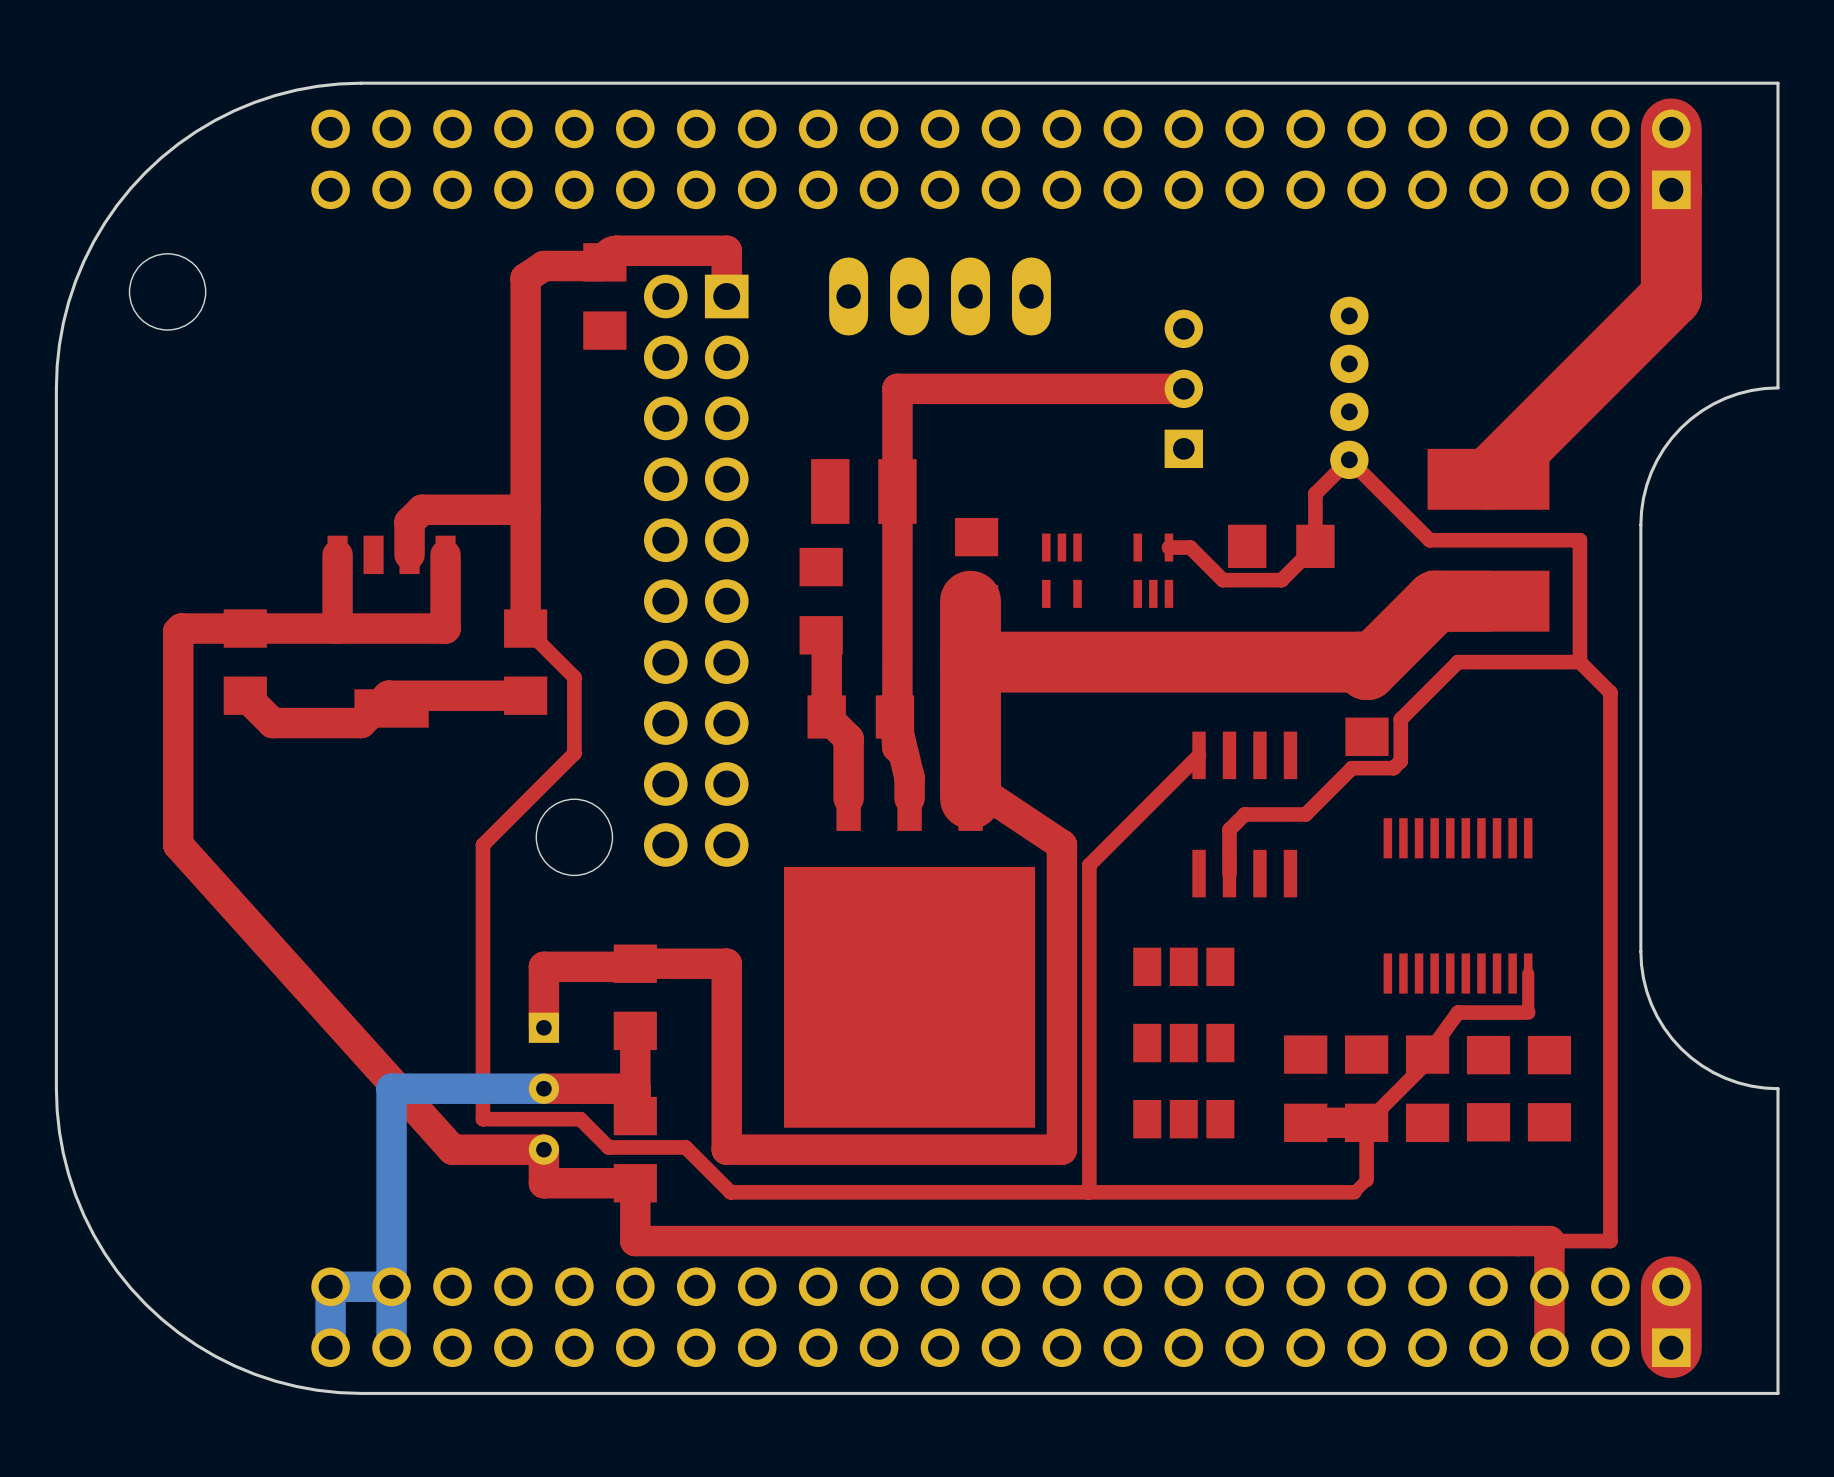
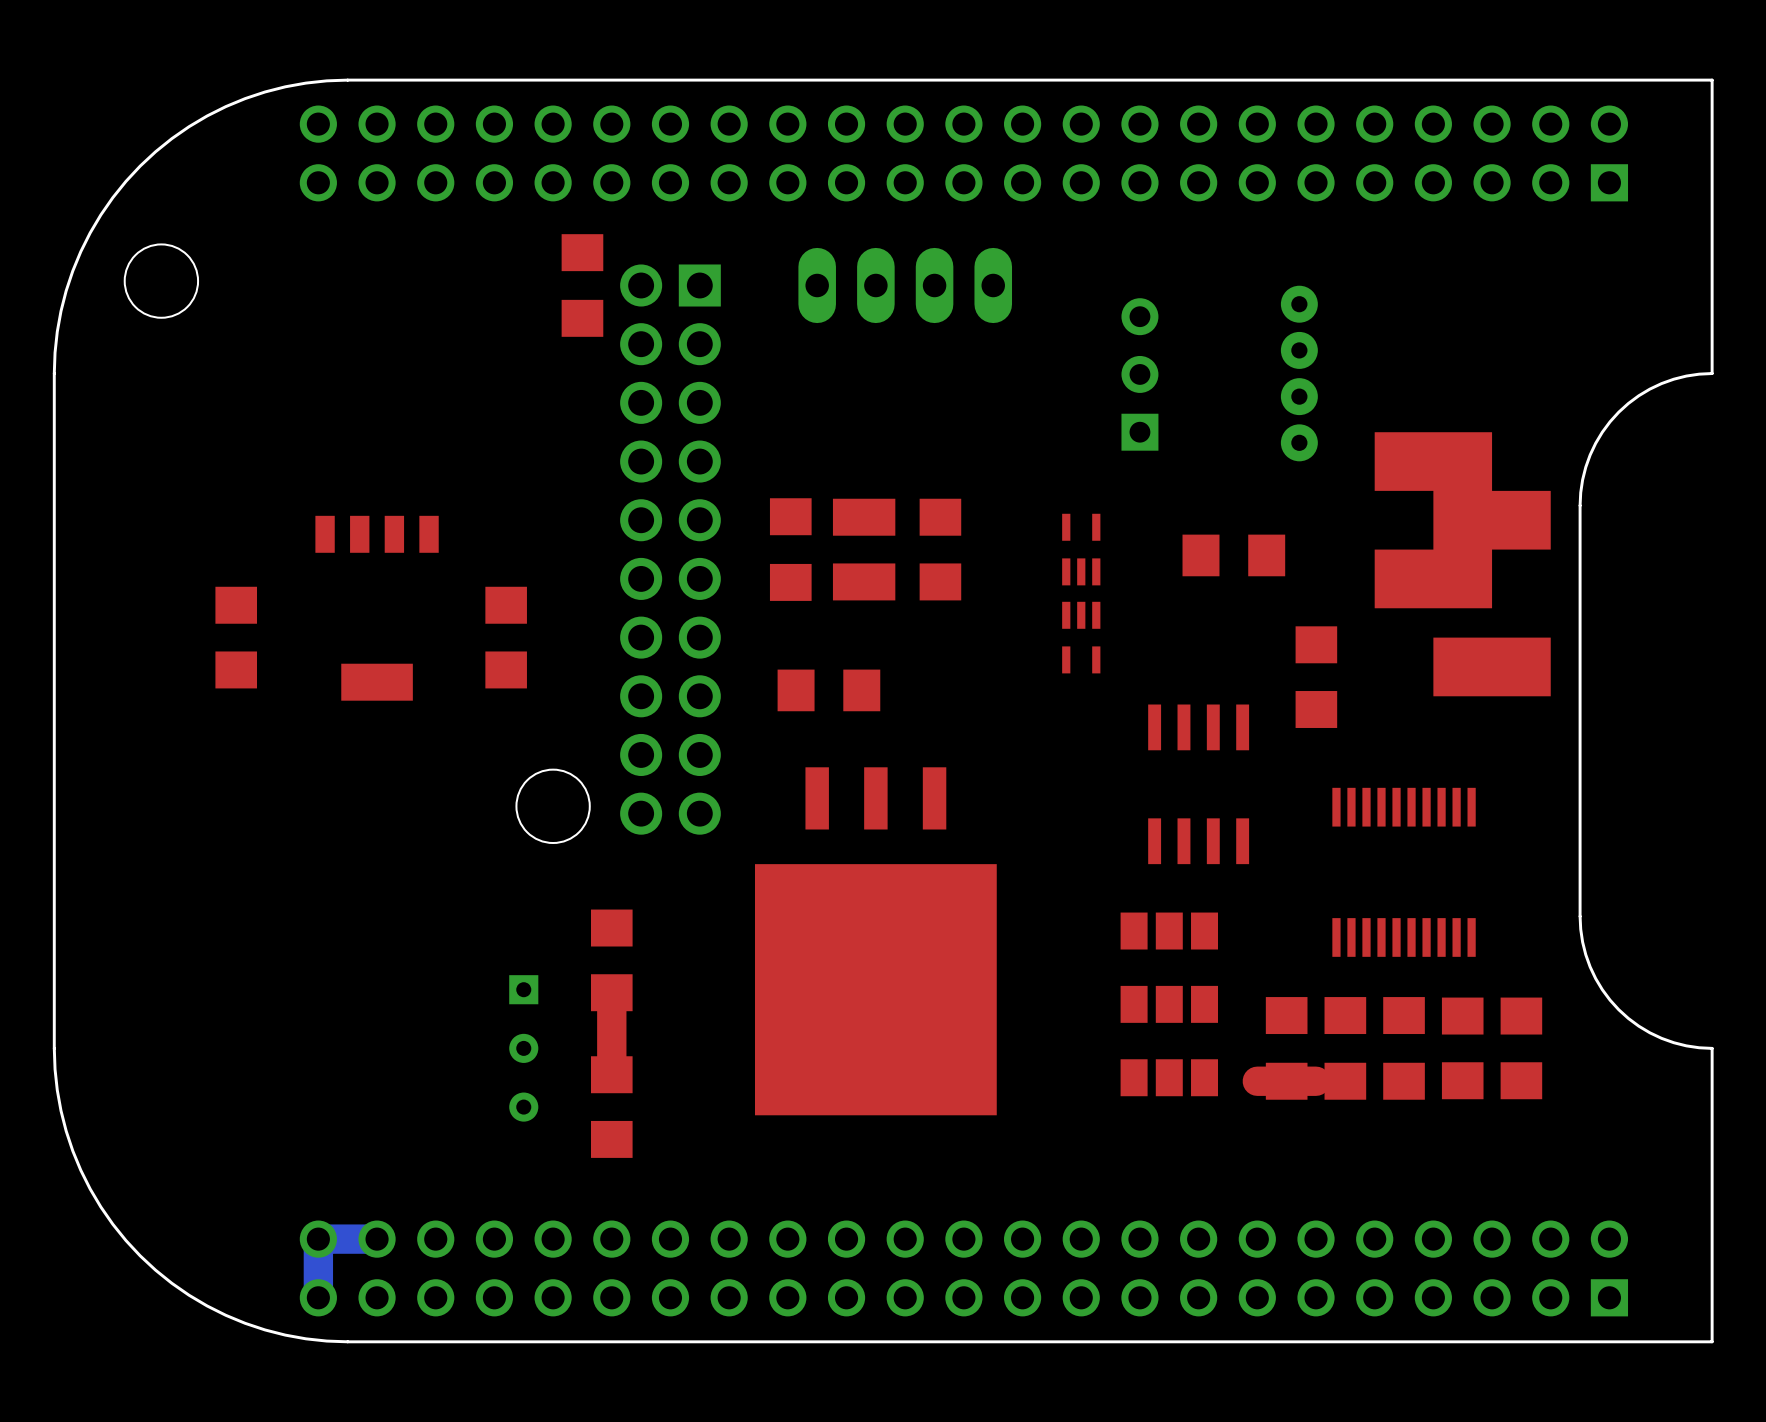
top track: (1671, 128) (1671, 296) (1488, 479) -> none
top track: (726, 296) (726, 250) (614, 250) (608, 254) (601, 266) (543, 266) (525, 278) (525, 628) (574, 677) (574, 753) (482, 844) (482, 1119) (580, 1119) (608, 1147) (685, 1147) (730, 1192) (1354, 1192) (1366, 1180) (1366, 1122) (1427, 1061) (1427, 1054) (1458, 1012) (1528, 1012) (1528, 973) -> none
top track: (1183, 388) (897, 388) (897, 491) (897, 747) (894, 716) (909, 777) (909, 798) -> none
part rotation: 0° (863, 491) -> 90° clockwise (864, 549)
part position: (863, 491) -> (864, 549)
top track: (525, 509) (422, 509) (409, 522) (409, 554) -> none
part: none -> (1492, 520)
part position: (1281, 546) -> (1233, 555)
top track: (1168, 547) (1190, 547) (1222, 580) (1281, 580) (1315, 546) (1315, 493) (1349, 459) (1429, 540) (1579, 540) (1579, 662) -> none
top track: (337, 554) (337, 628) -> none
top track: (445, 554) (445, 628) (181, 628) (178, 631) (178, 844) (452, 1149) (543, 1149) (543, 1183) (635, 1183) (635, 1241) (1549, 1241) (1549, 1347) -> none
part: (1061, 570) -> none
part: none -> (1081, 549)
part: (1153, 570) -> none
part position: (821, 601) -> (790, 549)
top track: (970, 601) (970, 798) -> none
top track: (1488, 601) (1435, 601) (1367, 669) (1359, 662) (970, 662) -> none
top track: (821, 635) (826, 640) (826, 716) (848, 738) (848, 798) -> none
part: none -> (1081, 637)
top track: (1579, 662) (1458, 662) (1400, 719) (1400, 761) (1393, 768) (1352, 768) (1305, 814) (1244, 814) (1229, 829) (1229, 873) -> none
top track: (1579, 662) (1610, 692) (1610, 1241) (1518, 1241) -> none
part: none -> (1492, 666)
top track: (525, 695) (388, 695) (361, 723) (272, 723) (245, 695) -> none
top track: (1199, 755) (1089, 865) (1088, 1192) -> none
top track: (970, 784) (1061, 844) (1061, 1149) (726, 1149) (726, 963) (635, 963) (635, 966) (543, 966) (543, 1027) -> none
part position: (909, 947) -> (875, 941)
part position: (1183, 966) -> (1169, 931)
part position: (1183, 1043) -> (1169, 1004)
bottom track: (543, 1088) (391, 1088) (391, 1347) -> none
top track: (635, 1088) (543, 1088) -> none
part: (1305, 1088) -> none
part: none -> (1286, 1048)
part: (1366, 1088) -> none
part: none -> (1345, 1048)
part: (1427, 1088) -> none
part: none -> (1404, 1048)
part: (1488, 1088) -> none
part: none -> (1462, 1048)
part: (1549, 1088) -> none
part: none -> (1521, 1048)
part position: (1183, 1119) -> (1169, 1077)
top track: (1671, 1286) (1671, 1347) -> none

